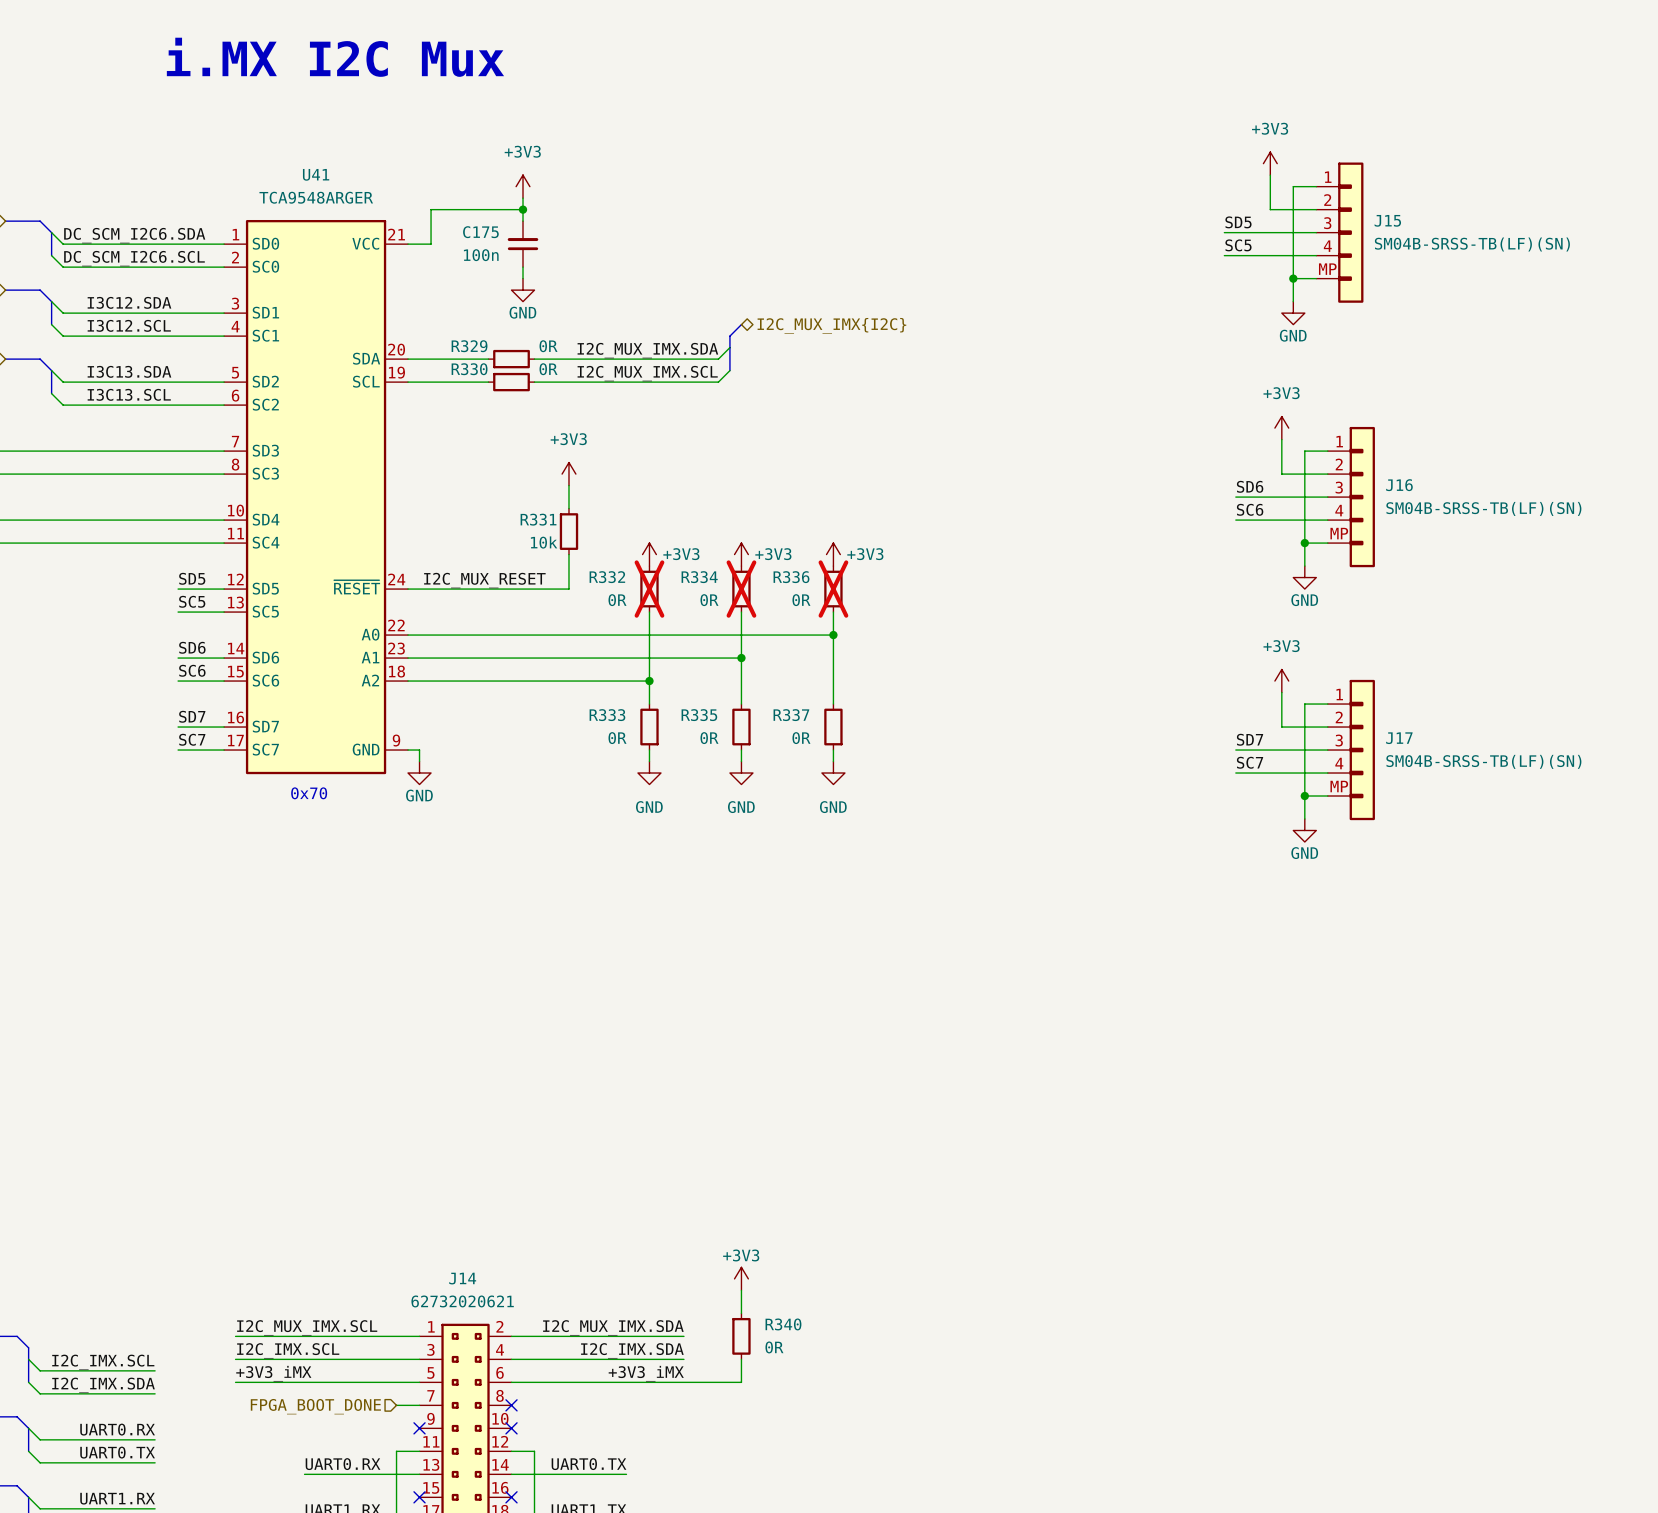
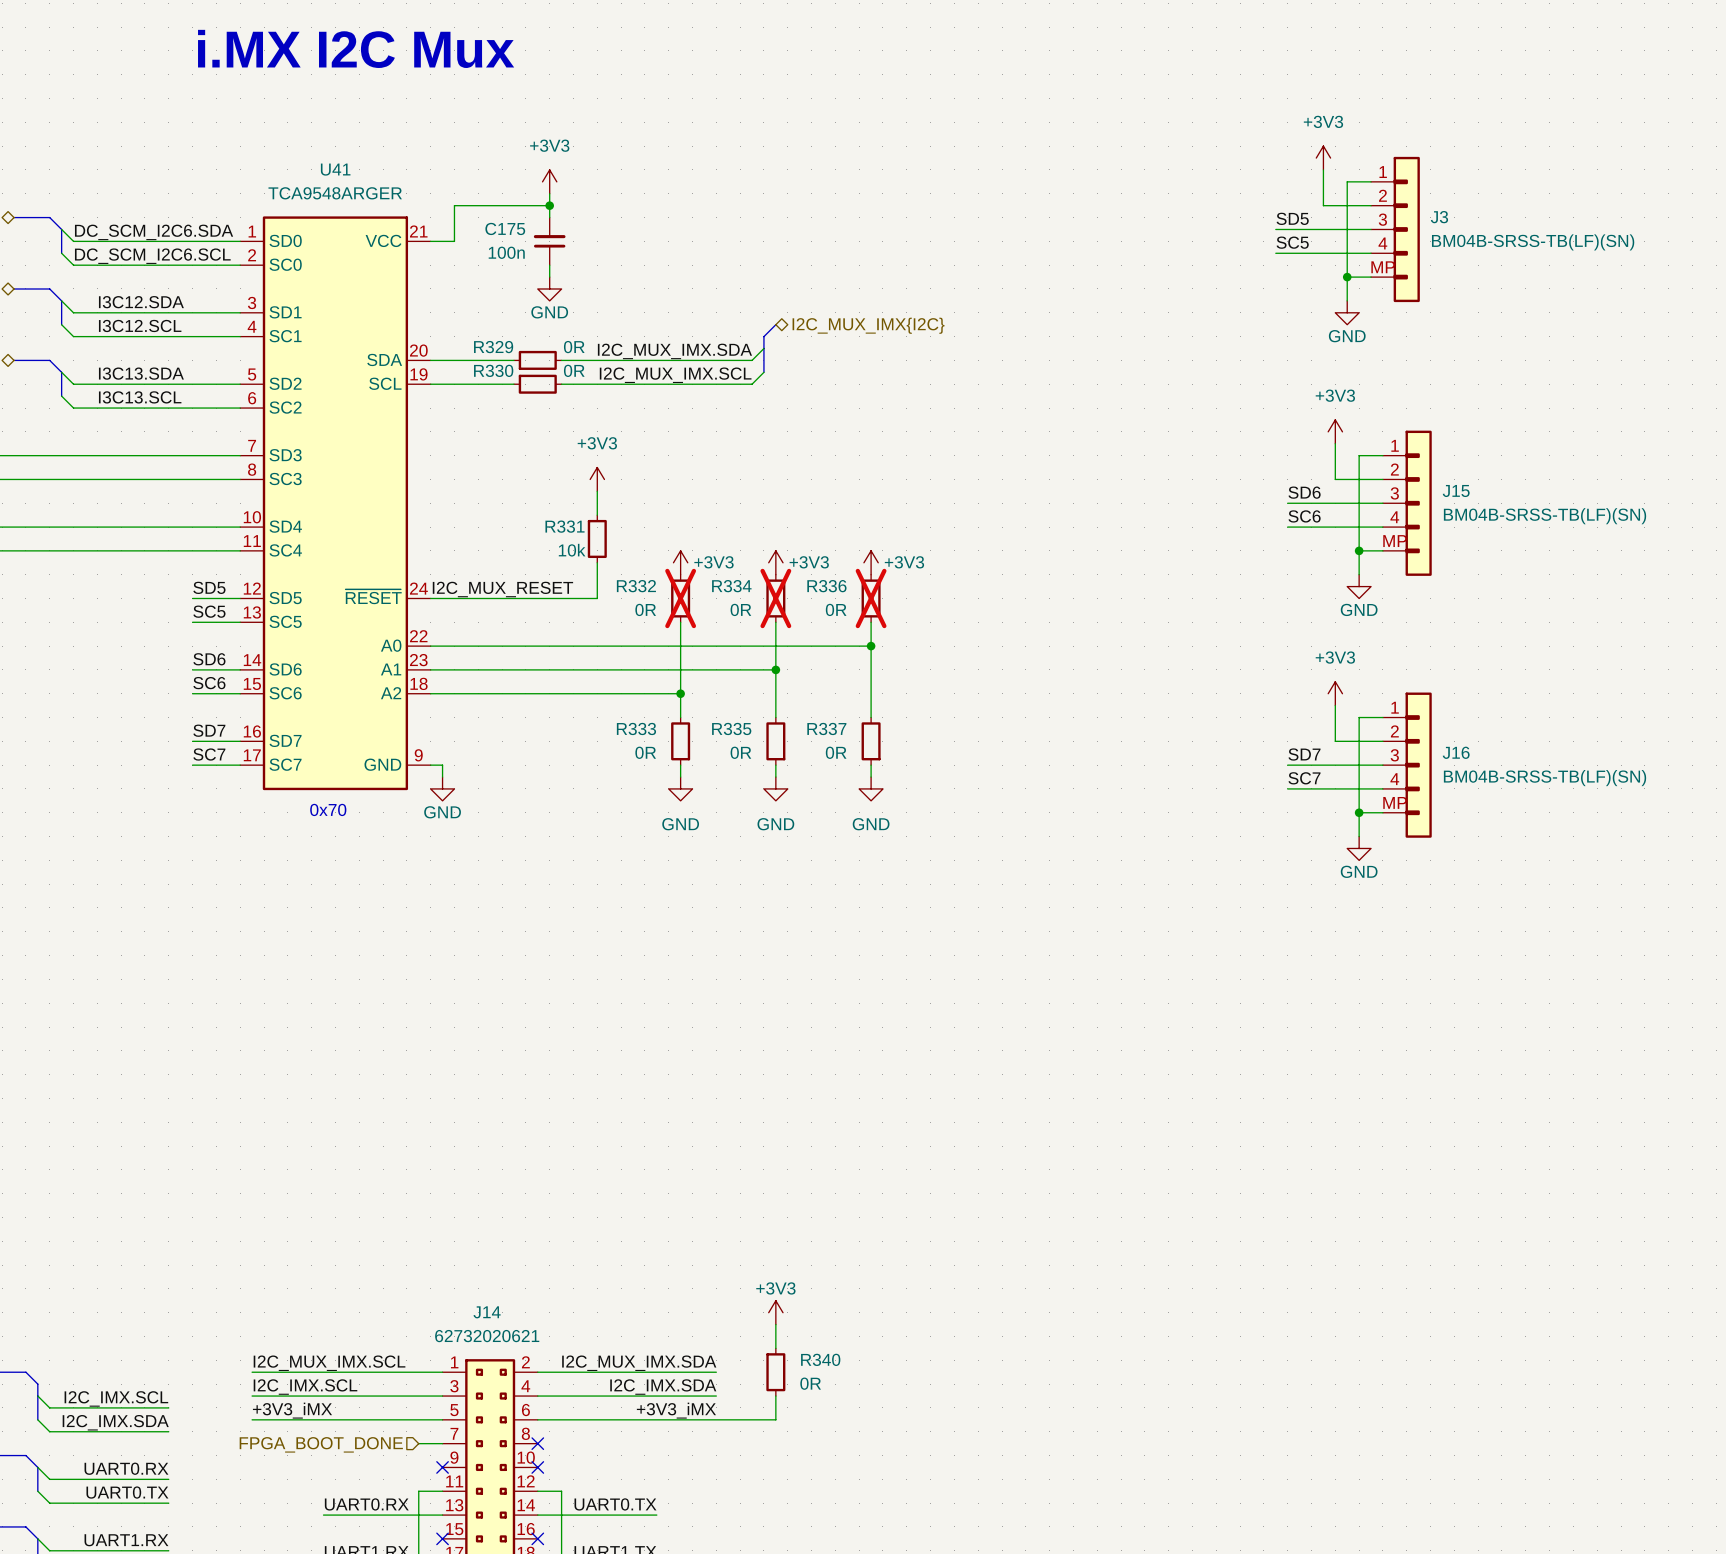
J15 name: J15 (1387, 220) -> J3 (1439, 217)
J15 text: SM04B-SRSS-TB(LF)(SN) (1472, 244) -> BM04B-SRSS-TB(LF)(SN) (1533, 242)
J16 name: J16 (1399, 485) -> J15 (1456, 491)
J16 text: SM04B-SRSS-TB(LF)(SN) (1483, 508) -> BM04B-SRSS-TB(LF)(SN) (1545, 516)
J17 name: J17 (1399, 738) -> J16 (1456, 752)
J17 text: SM04B-SRSS-TB(LF)(SN) (1483, 761) -> BM04B-SRSS-TB(LF)(SN) (1545, 778)

